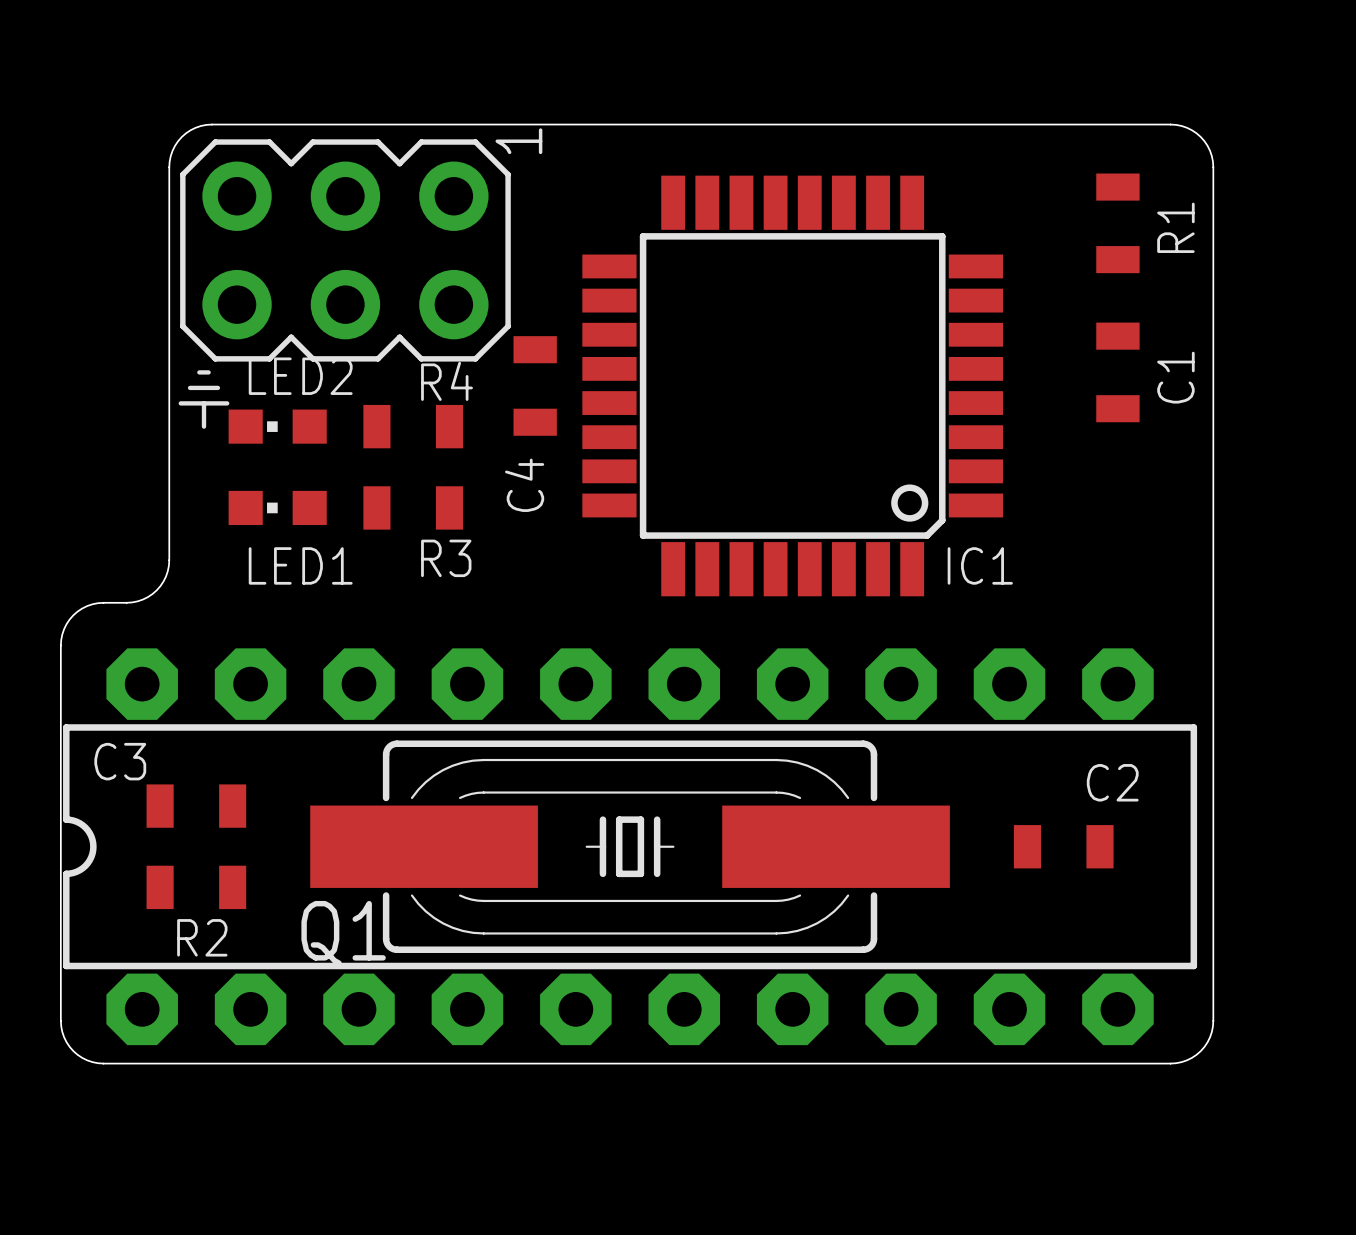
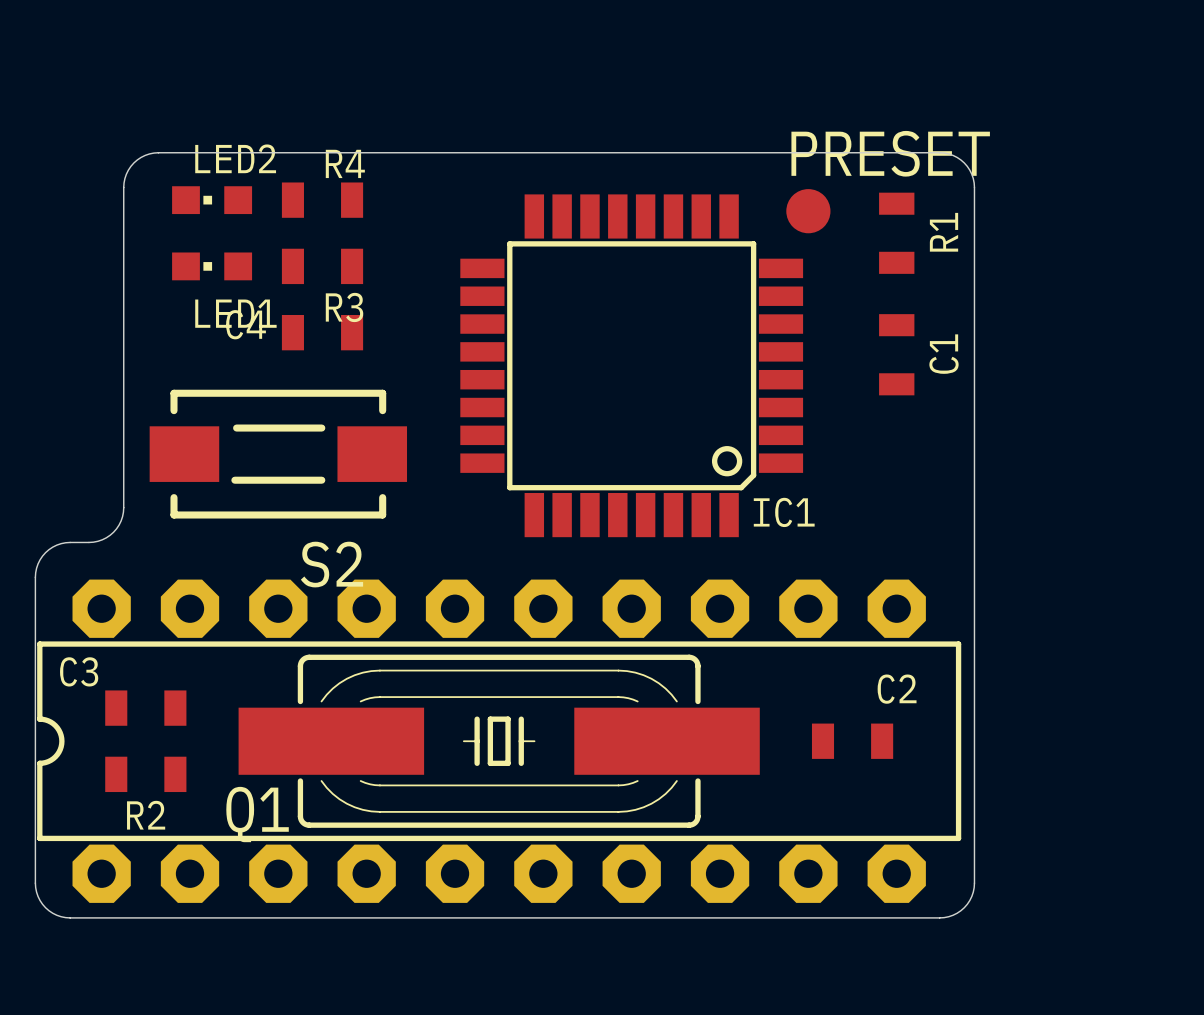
PRESET: none -> (808, 211)
part: (345, 250) -> none
C4 rotation: 0° (535, 385) -> 90° clockwise (322, 332)
C4 position: (535, 385) -> (322, 332)
text: ⏚ (203, 399) -> none
LED2 position: (277, 426) -> (212, 200)
R4 position: (413, 426) -> (322, 200)
S2: none -> (278, 454)
LED1 position: (277, 507) -> (212, 266)
R3 position: (413, 507) -> (322, 266)

